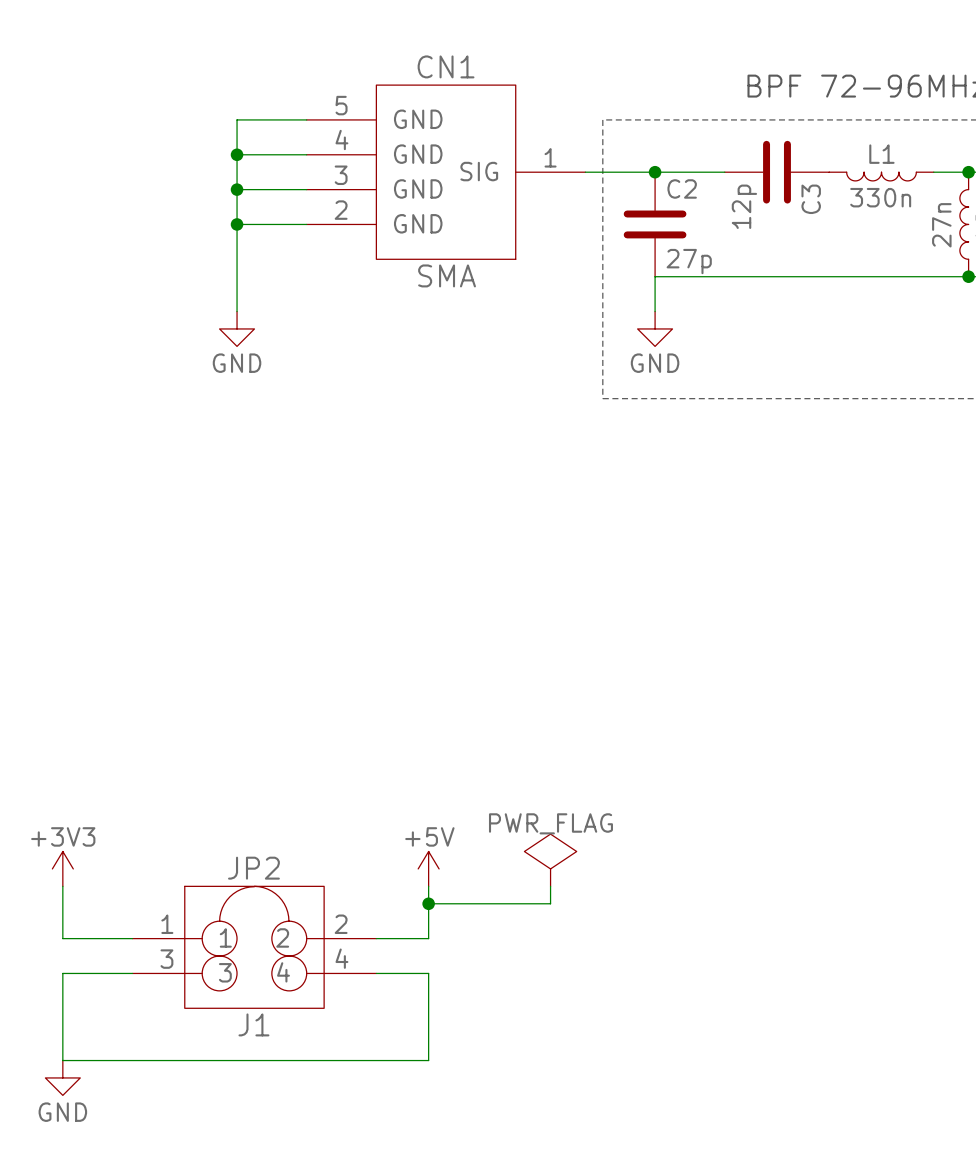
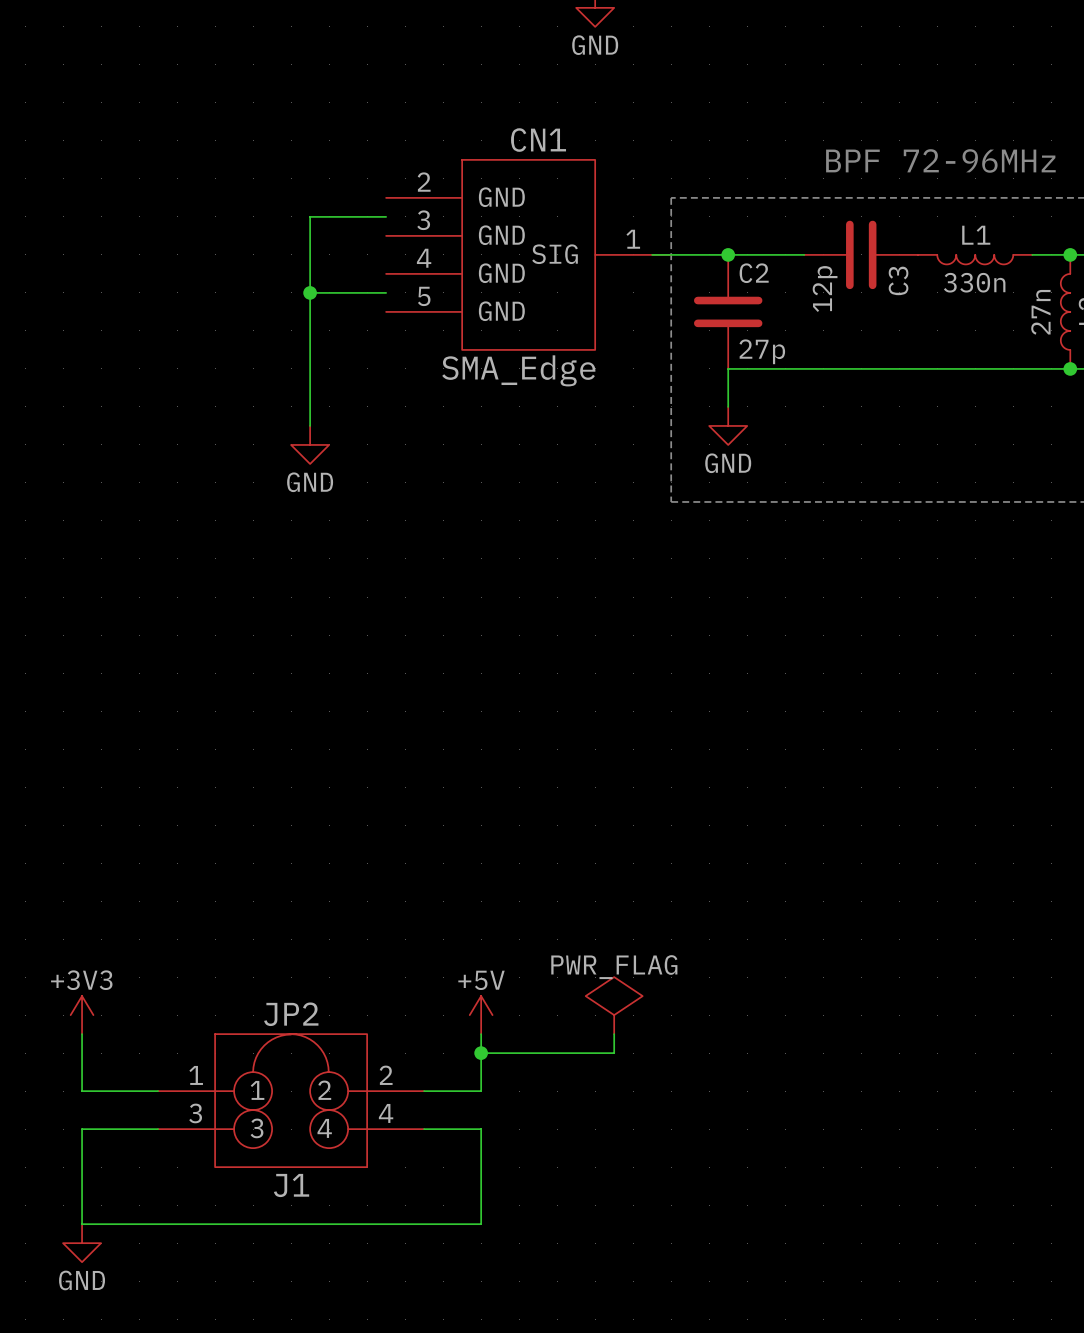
CN1 symbol: [306, 85, 586, 260] -> [386, 159, 672, 350]
wire: (306, 119) (237, 119) (237, 311) -> (386, 216) (310, 216) (310, 425)
wire: (237, 154) (306, 154) -> none
junction: (237, 154) -> none
wire: (237, 189) (306, 189) -> (310, 292) (386, 292)
junction: (237, 189) -> none
junction: none -> (310, 292)
wire: (237, 224) (306, 224) -> none
junction: (237, 224) -> none
CN1 value: SMA (447, 275) -> SMA_Edge (518, 370)
power symbol position: GND (237, 328) -> GND (310, 444)

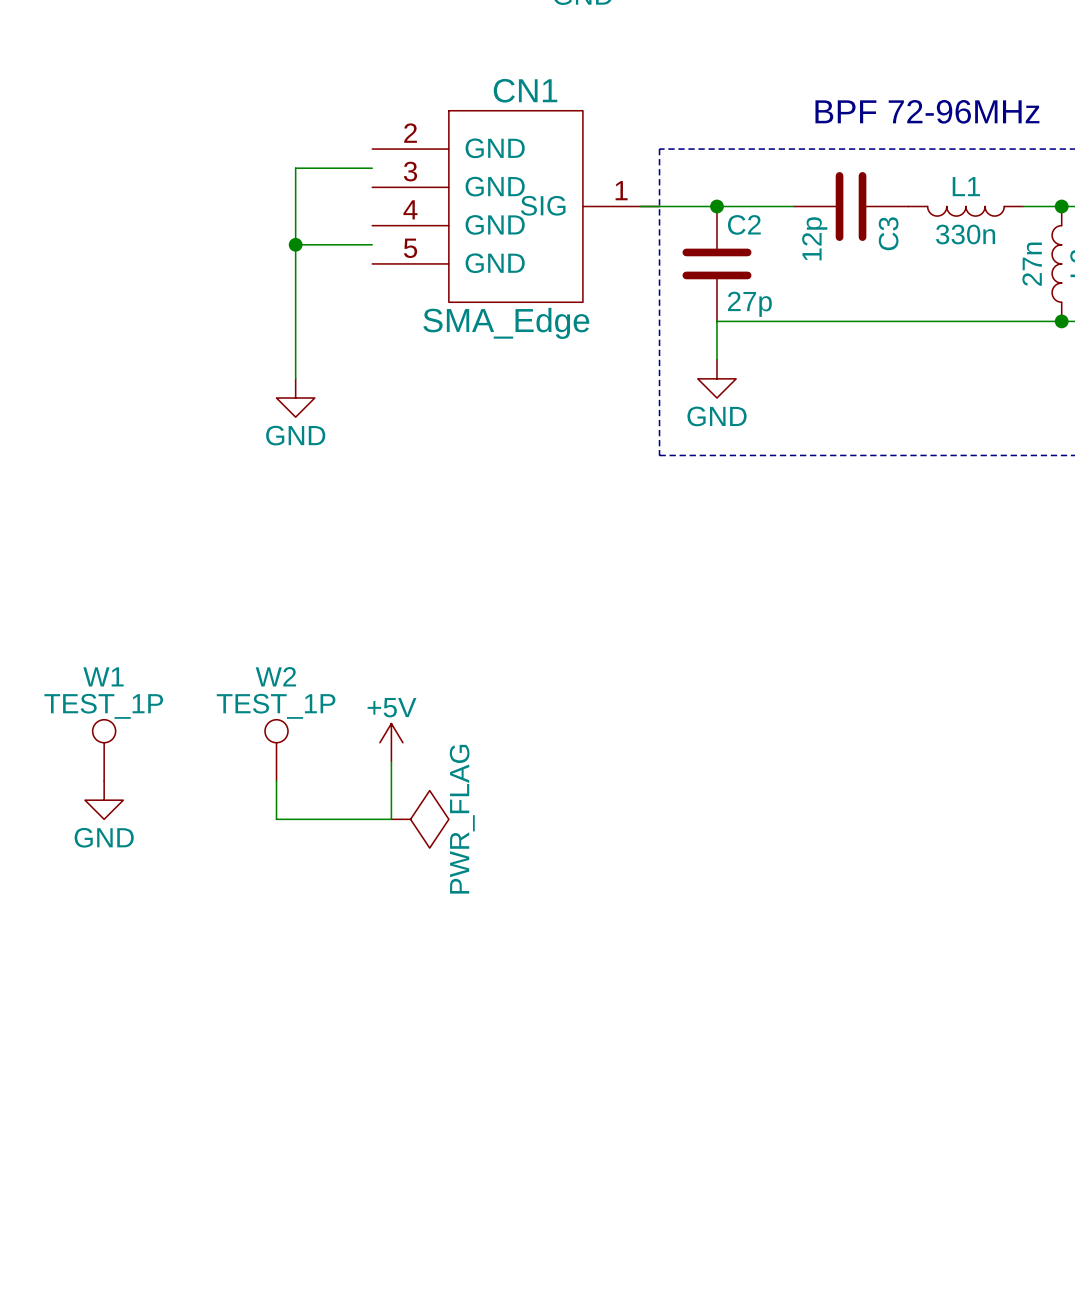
W1: none -> TEST_1P (104, 750)
W2: none -> TEST_1P (276, 750)
wire: none -> (391, 761) (391, 819) (276, 819) (276, 781)
power symbol: none -> GND (104, 800)
power symbol rotation: 0° (614, 1005) -> 90° clockwise (420, 819)
power symbol position: PWR_FLAG (614, 1005) -> PWR_FLAG (420, 819)
power symbol: +3V3 (82, 1015) -> none
power symbol position: +5V (481, 1015) -> +5V (391, 742)
wire: (82, 1034) (82, 1091) (158, 1091) -> none
wire: (481, 1034) (481, 1091) (424, 1091) -> none
wire: (614, 1034) (614, 1053) (481, 1053) -> none
junction: (481, 1053) -> none
J1: JP2 (291, 1100) -> none
wire: (158, 1129) (82, 1129) (82, 1224) (481, 1224) (481, 1129) (424, 1129) -> none
power symbol: GND (82, 1243) -> none

